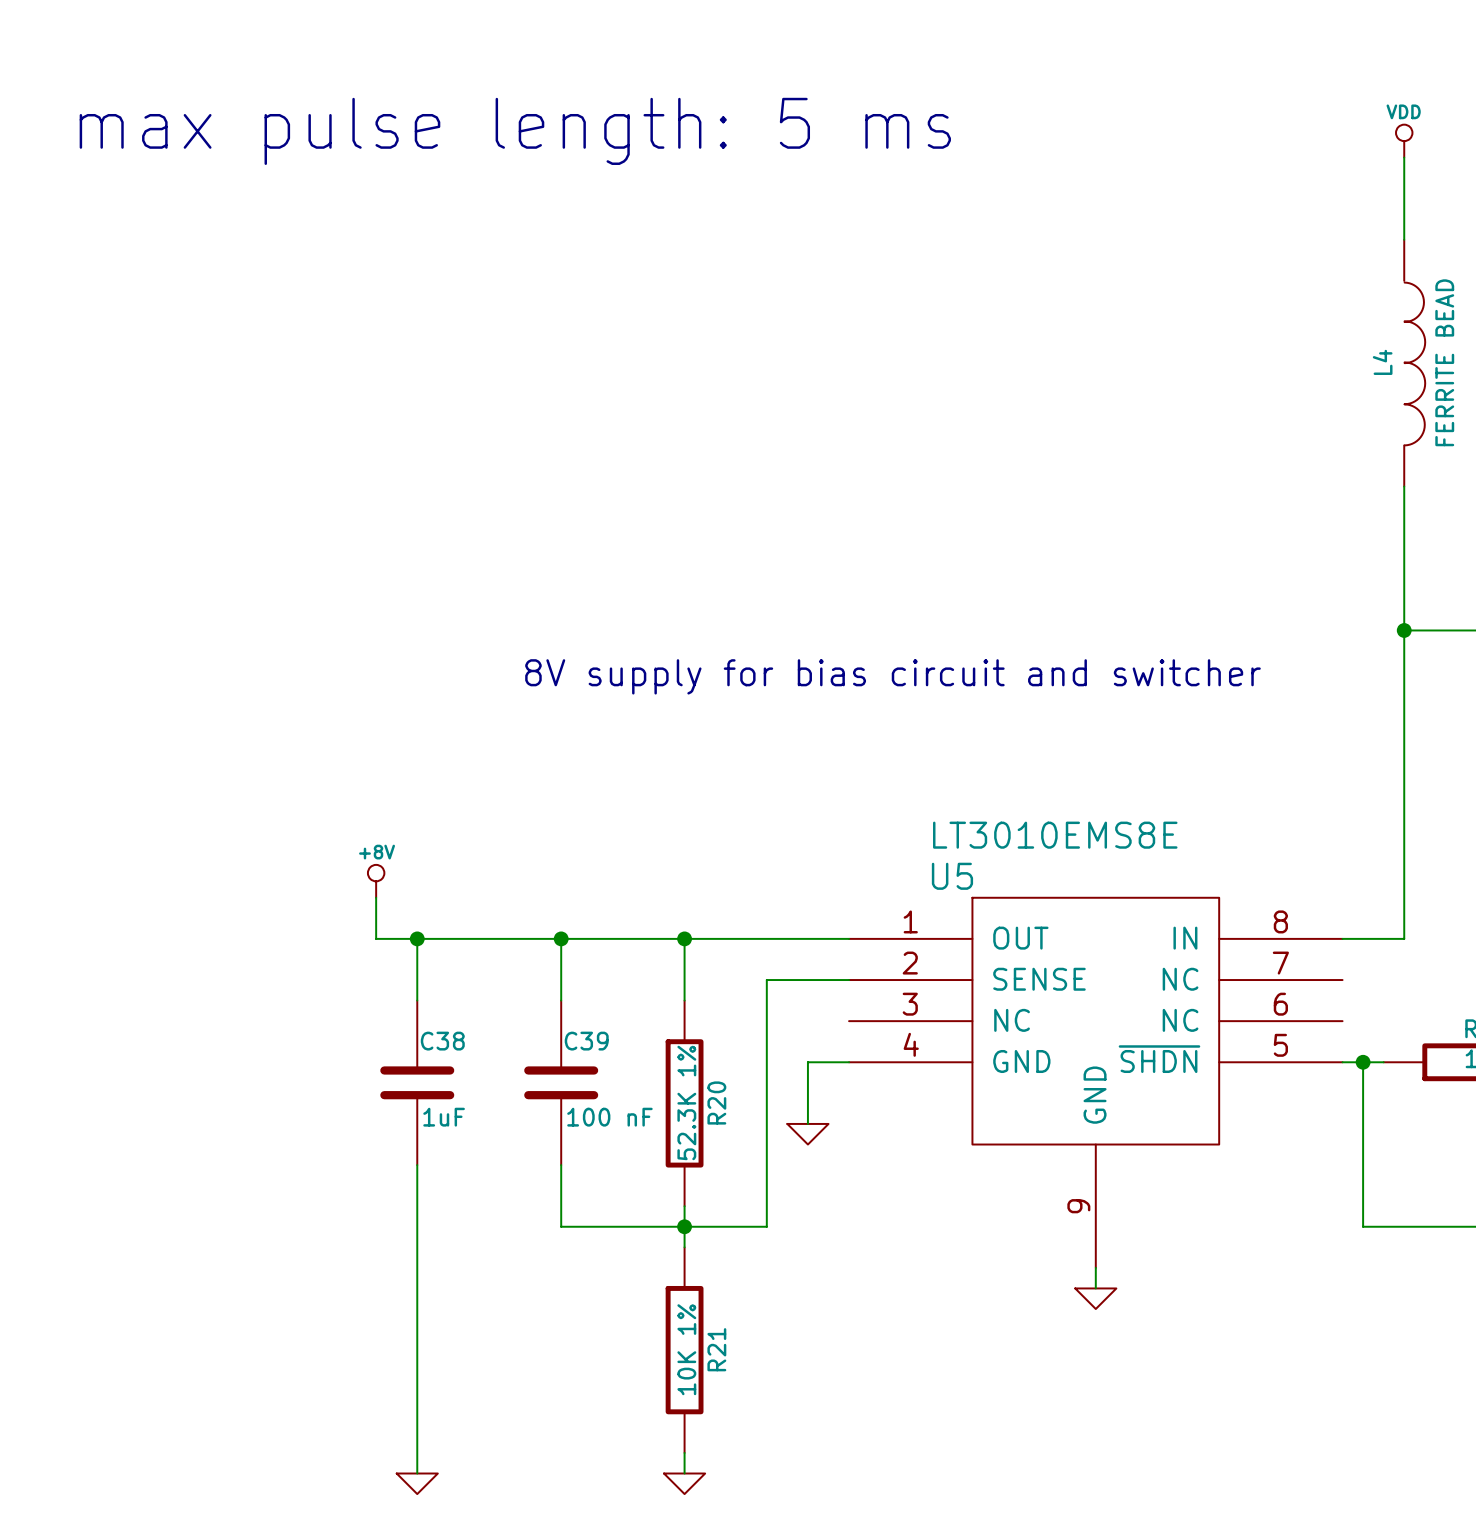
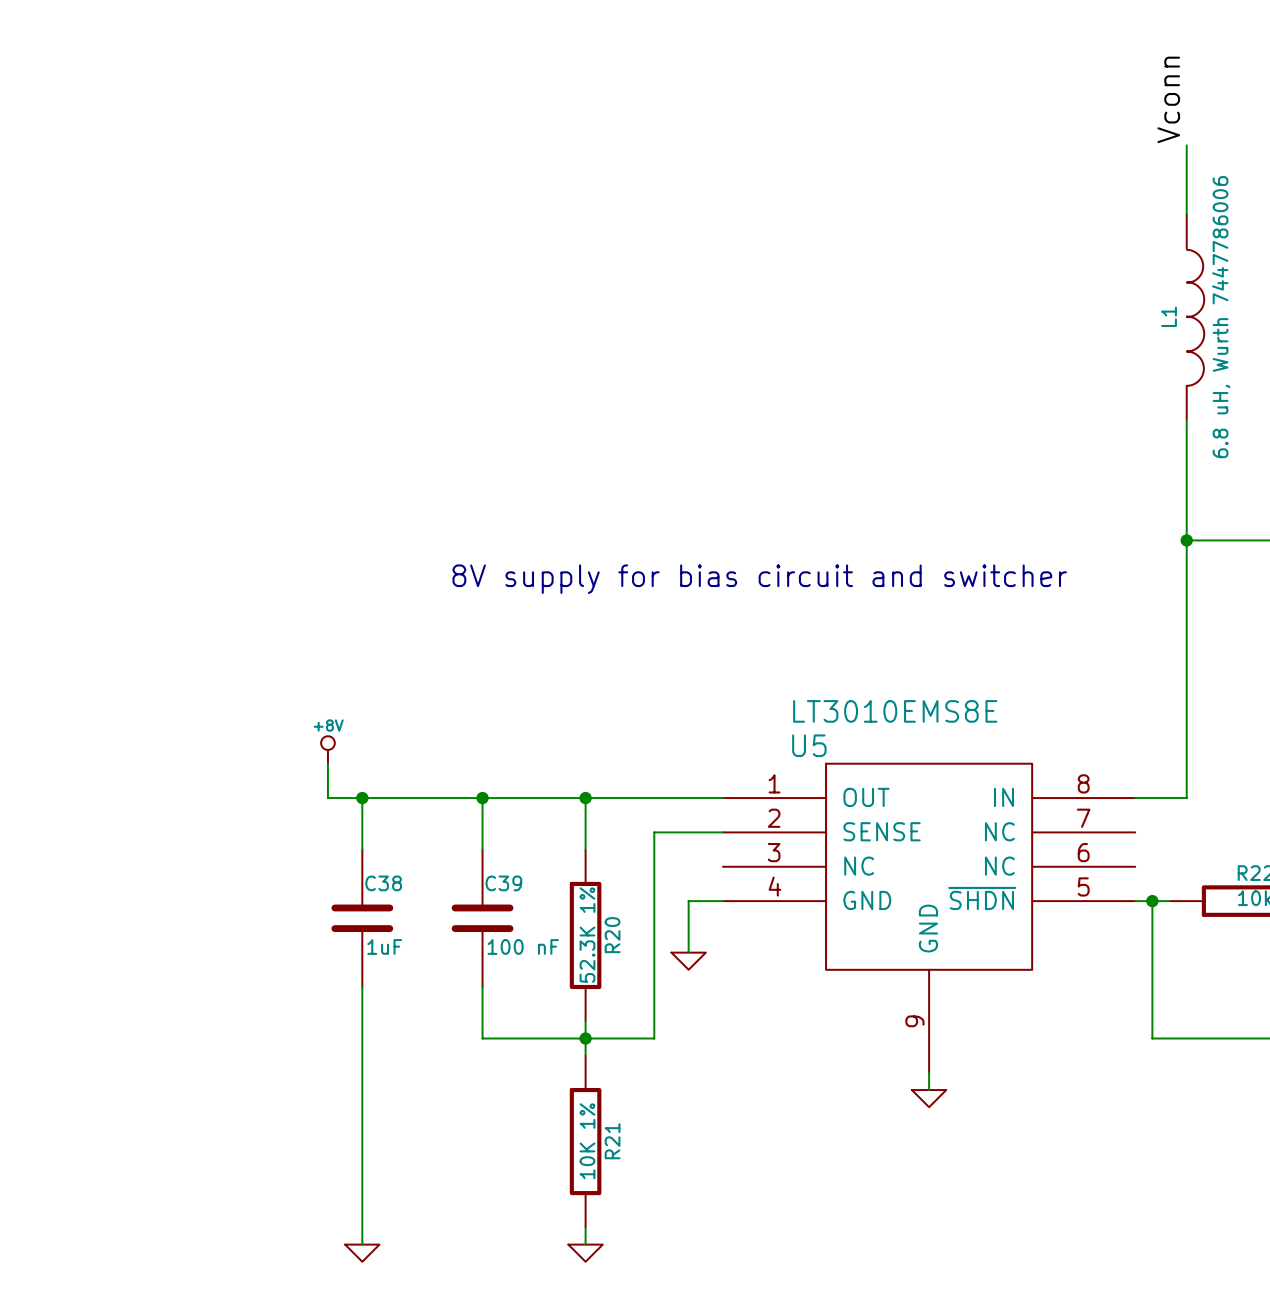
label: none -> Vconn (1168, 99)
text: max pulse length: 5 ms (515, 131) -> none
power symbol: VDD (1404, 141) -> none
L4 name: L4 (1382, 362) -> L1 (1169, 316)
L4 value: FERRITE BEAD (1444, 362) -> 6.8 uH, Wurth 7447786006 (1221, 317)

